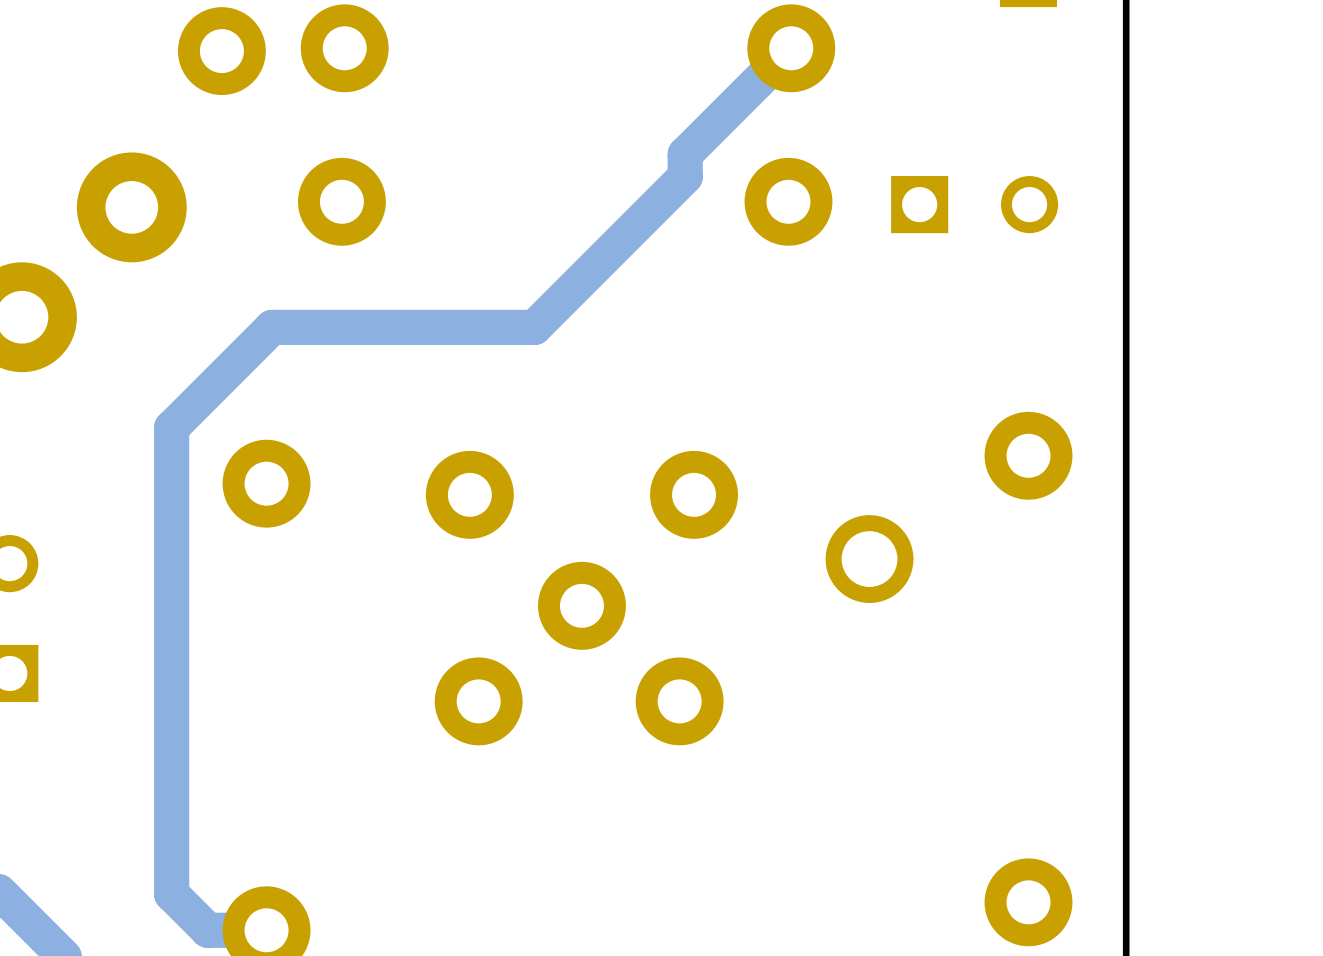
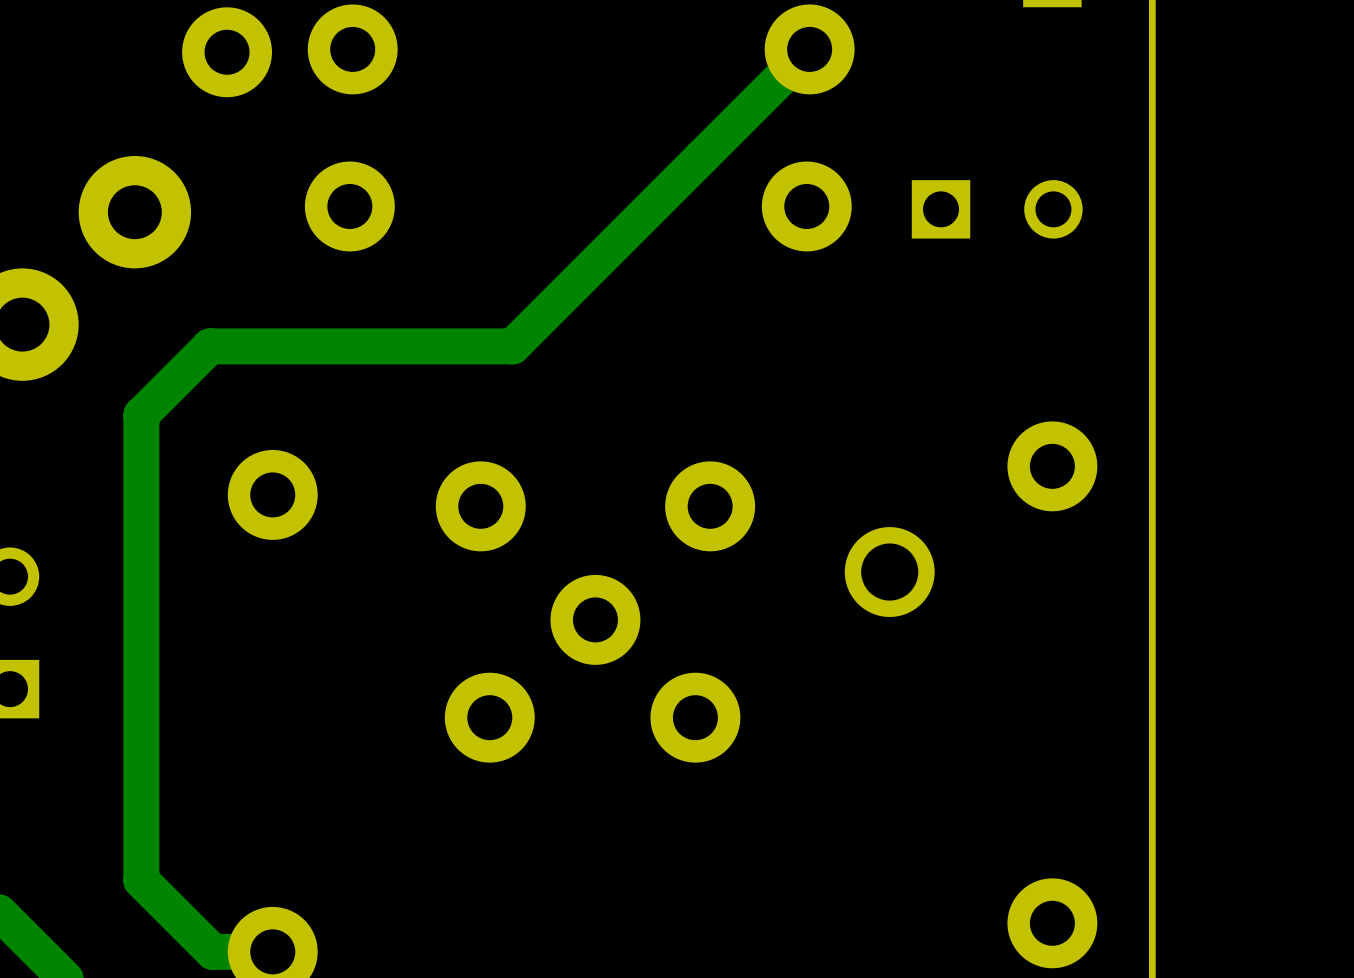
track: (685, 154) (685, 176) (534, 327) (272, 327) (171, 427) (171, 893) -> (701, 157) (512, 346) (209, 346) (141, 414) (141, 880) (175, 914)

